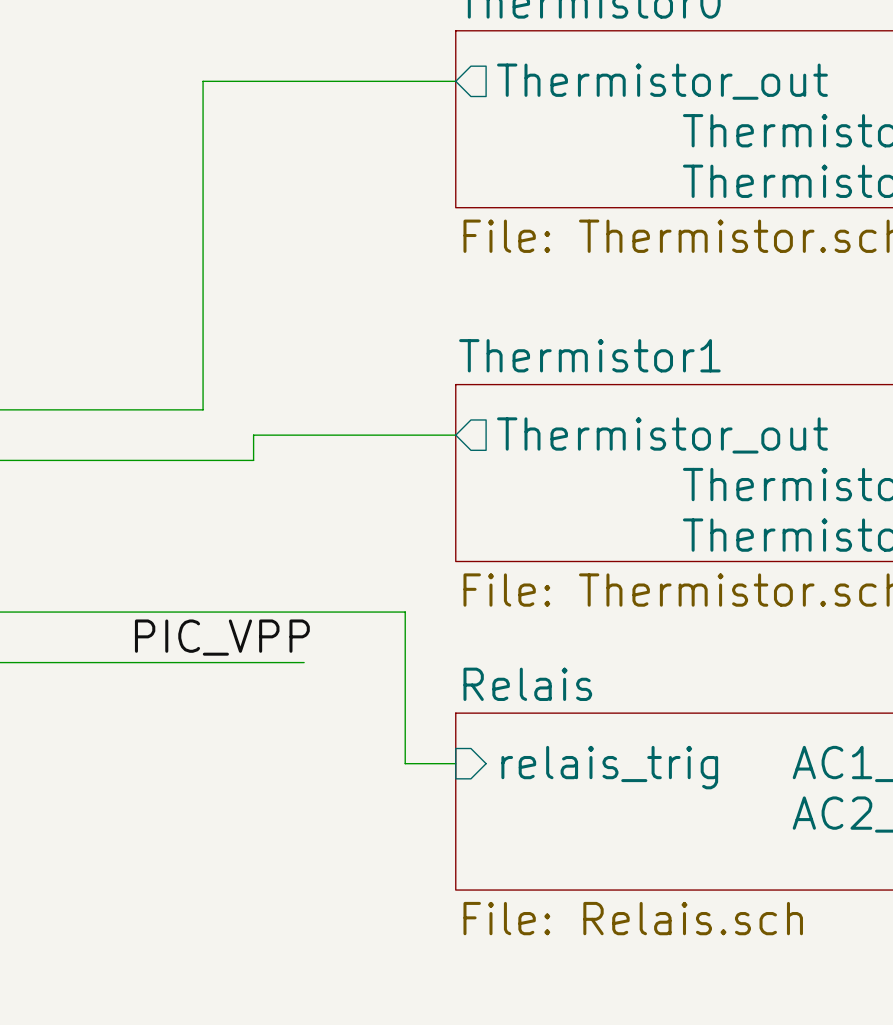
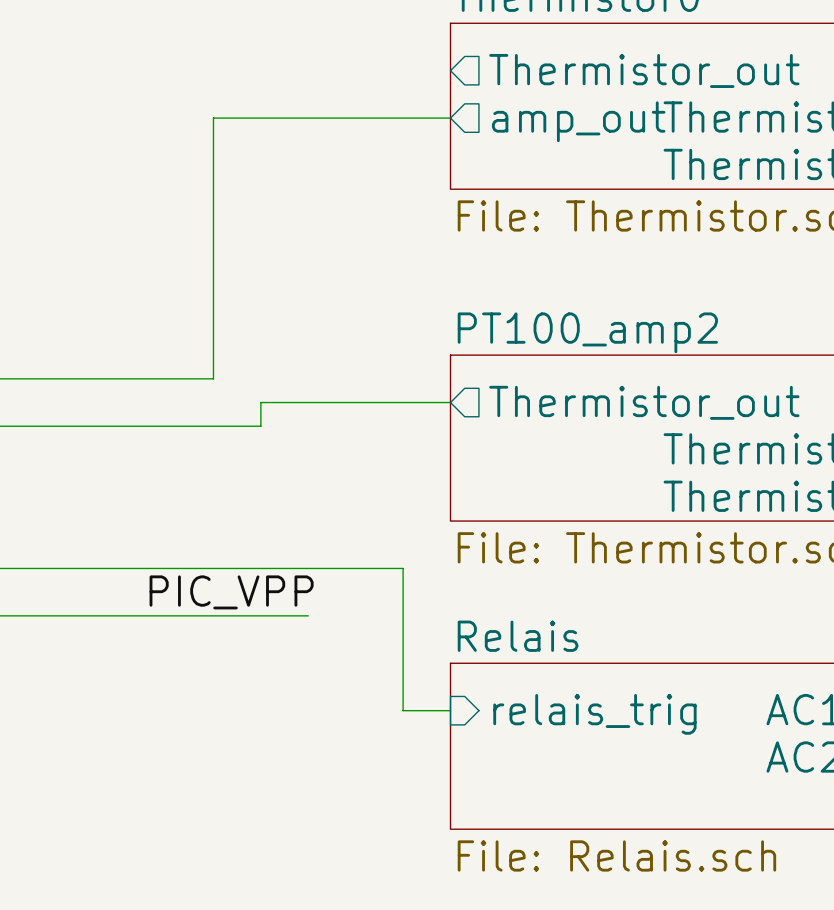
wire: (455, 81) (203, 81) (203, 131) -> (450, 118) (213, 118)
sheet pin: none -> amp_out (578, 121)
sheet Thermistor1 name: Thermistor1 (589, 355) -> PT100_amp2 (587, 332)

